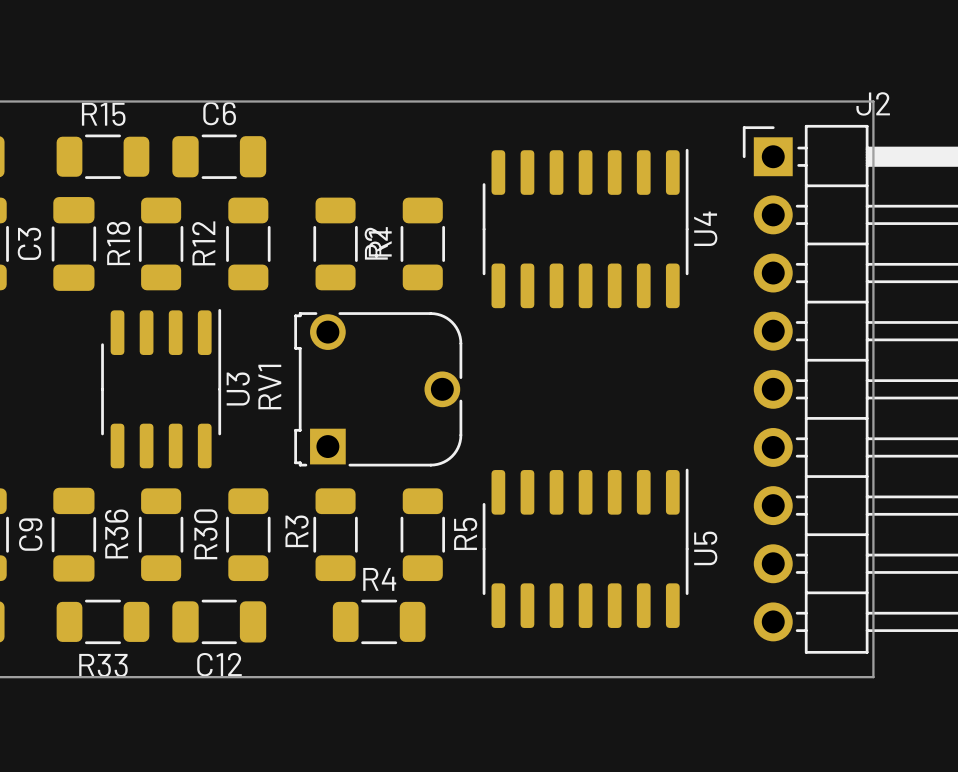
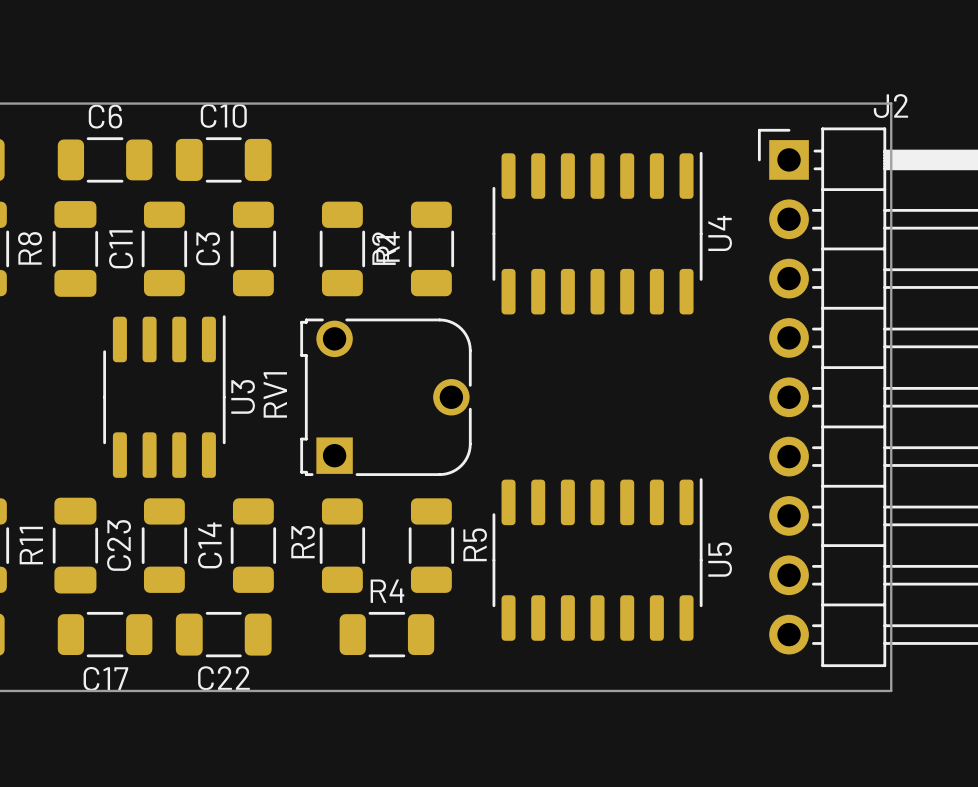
C6 name: C6 (219, 113) -> C10 (223, 115)
R15 name: R15 (103, 114) -> C6 (105, 116)
C3 name: C3 (29, 243) -> R8 (30, 248)
R18 name: R18 (118, 243) -> C11 (121, 249)
R12 name: R12 (203, 243) -> C3 (208, 248)
R36 name: R36 (116, 533) -> C23 (119, 545)
C9 name: C9 (30, 534) -> R11 (31, 545)
R30 name: R30 (205, 534) -> C14 (210, 545)
C12 name: C12 (219, 664) -> C22 (223, 678)
R33 name: R33 (103, 665) -> C17 (105, 678)

